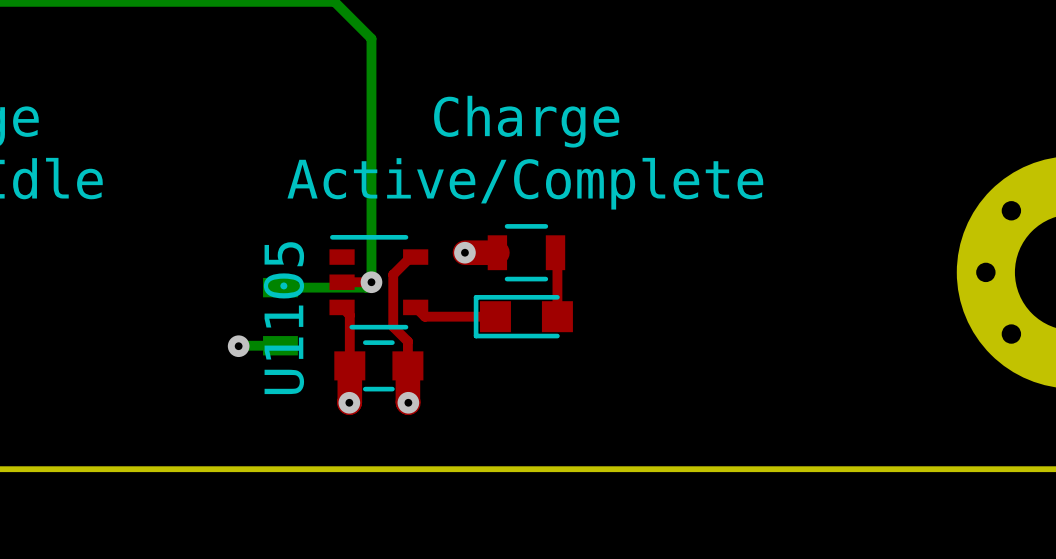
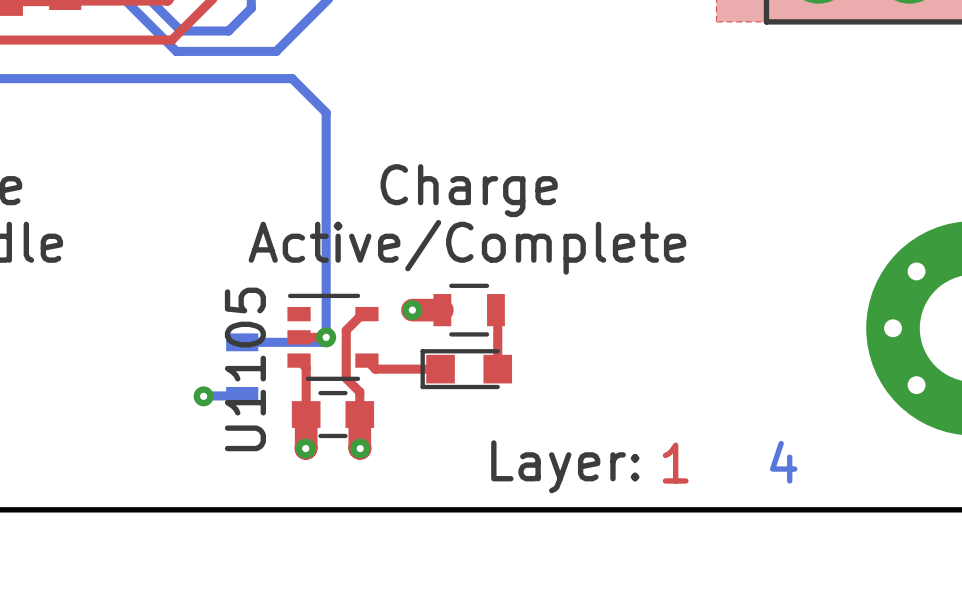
text: none -> 1 (675, 463)
text: none -> 4 (783, 462)
text: none -> Layer: (565, 466)

